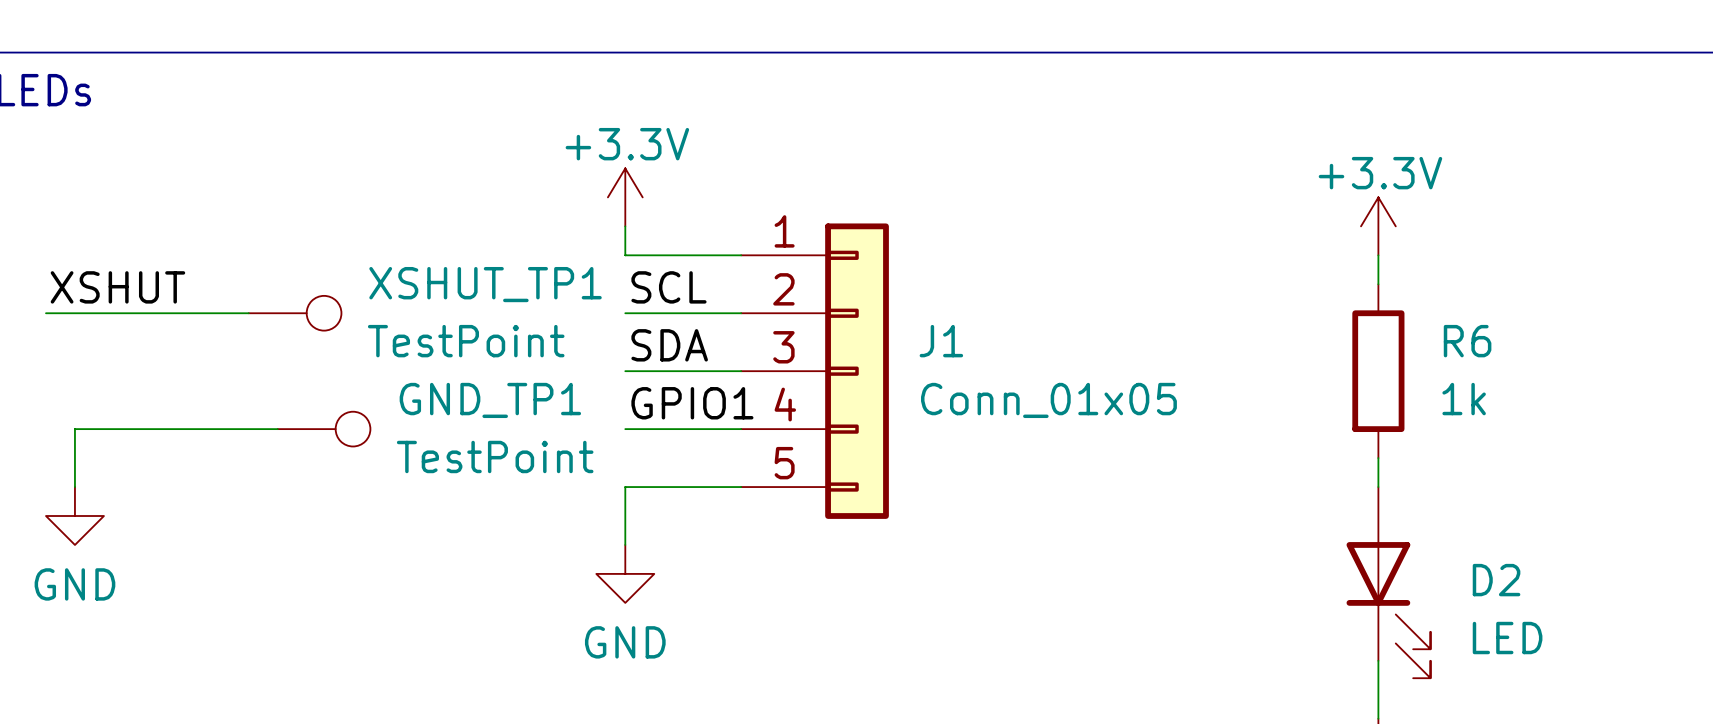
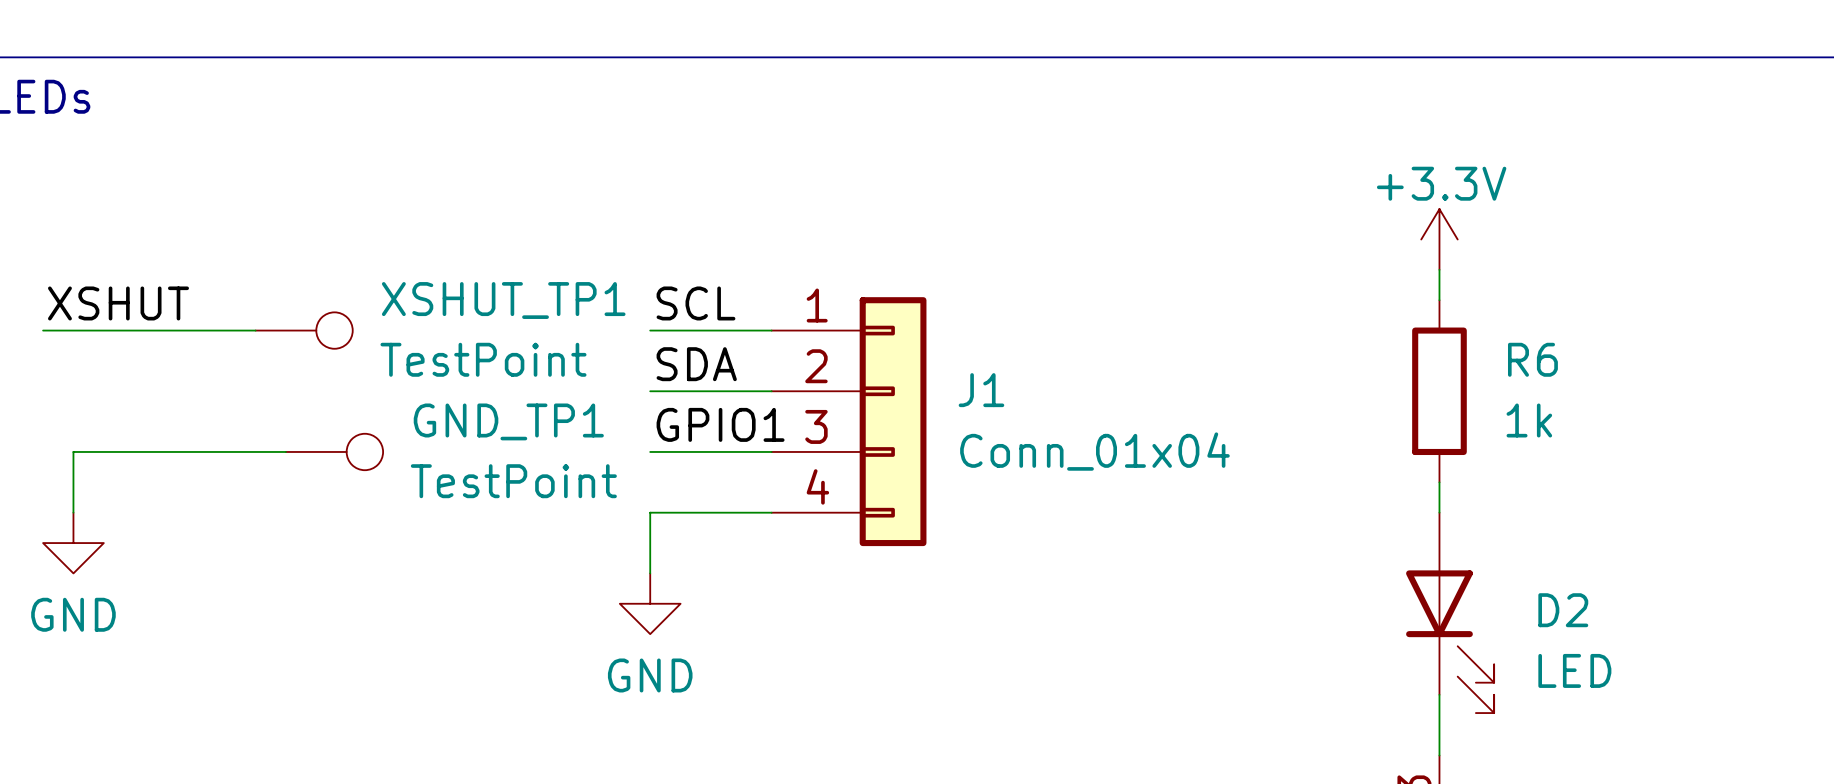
power symbol: +3.3V (625, 197) -> none
J1 symbol: [741, 223, 889, 519] -> [771, 297, 927, 547]
wire: (625, 226) (625, 255) (741, 255) -> none
J1 value: Conn_01x05 (1048, 400) -> Conn_01x04 (1094, 451)

